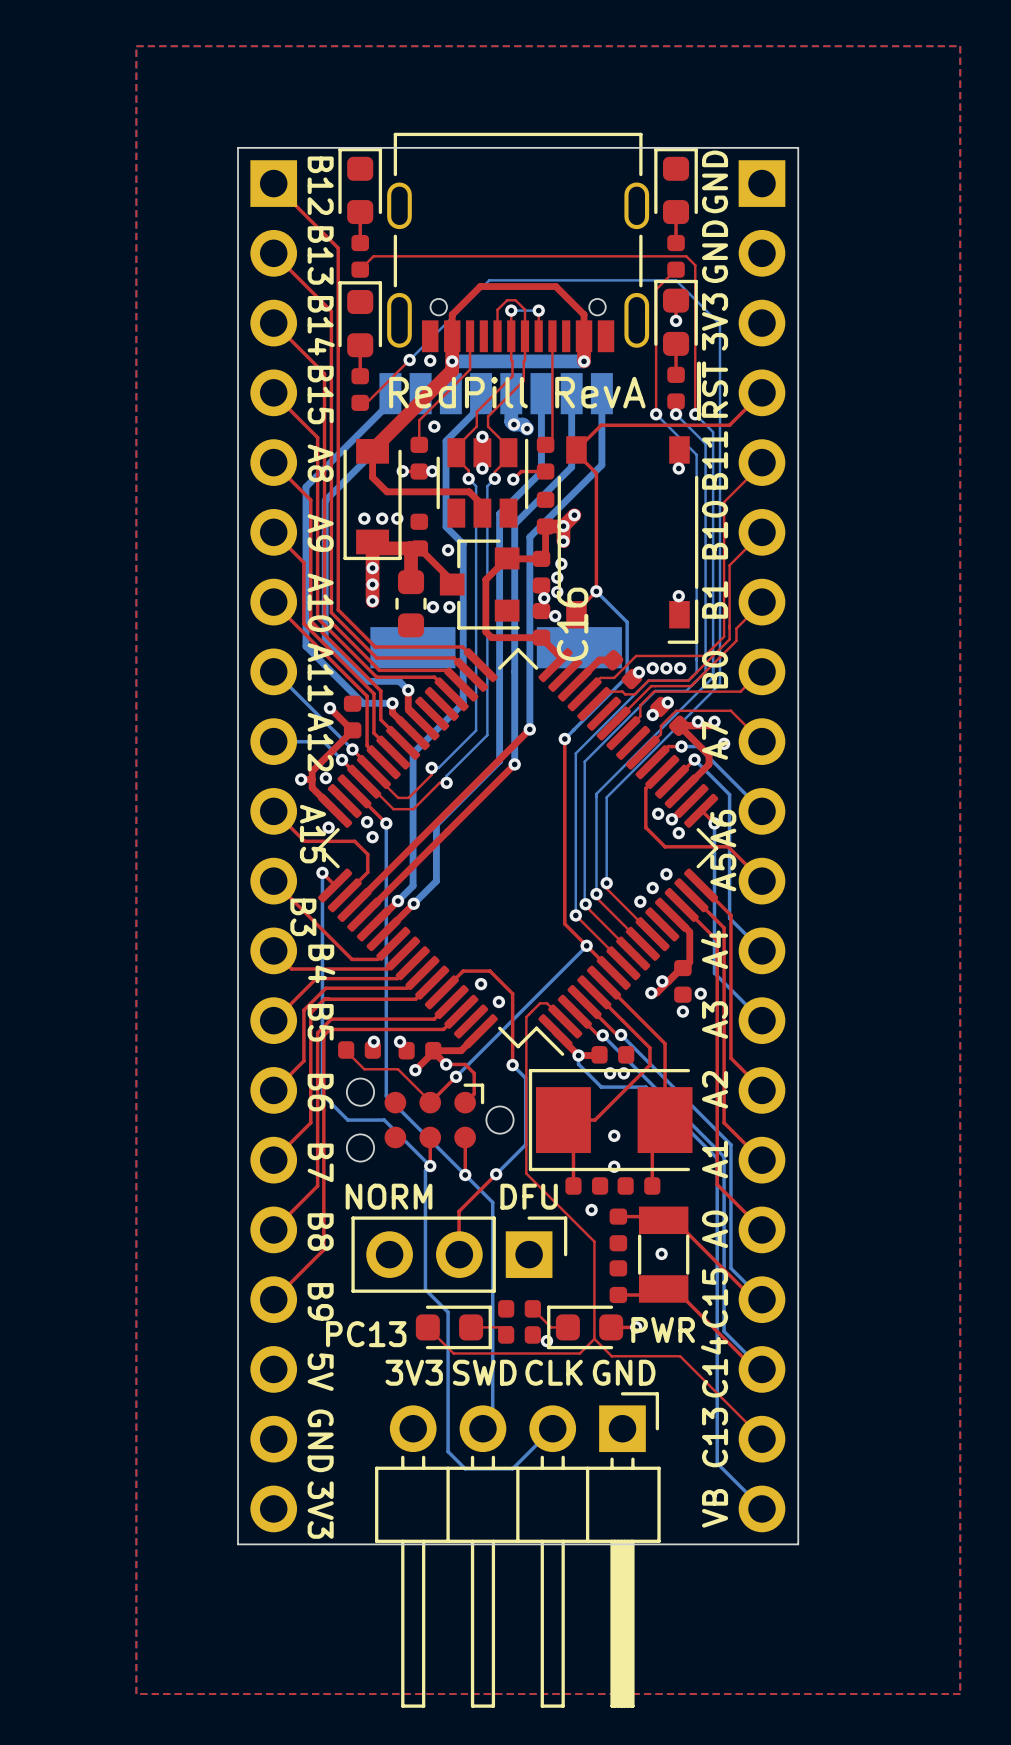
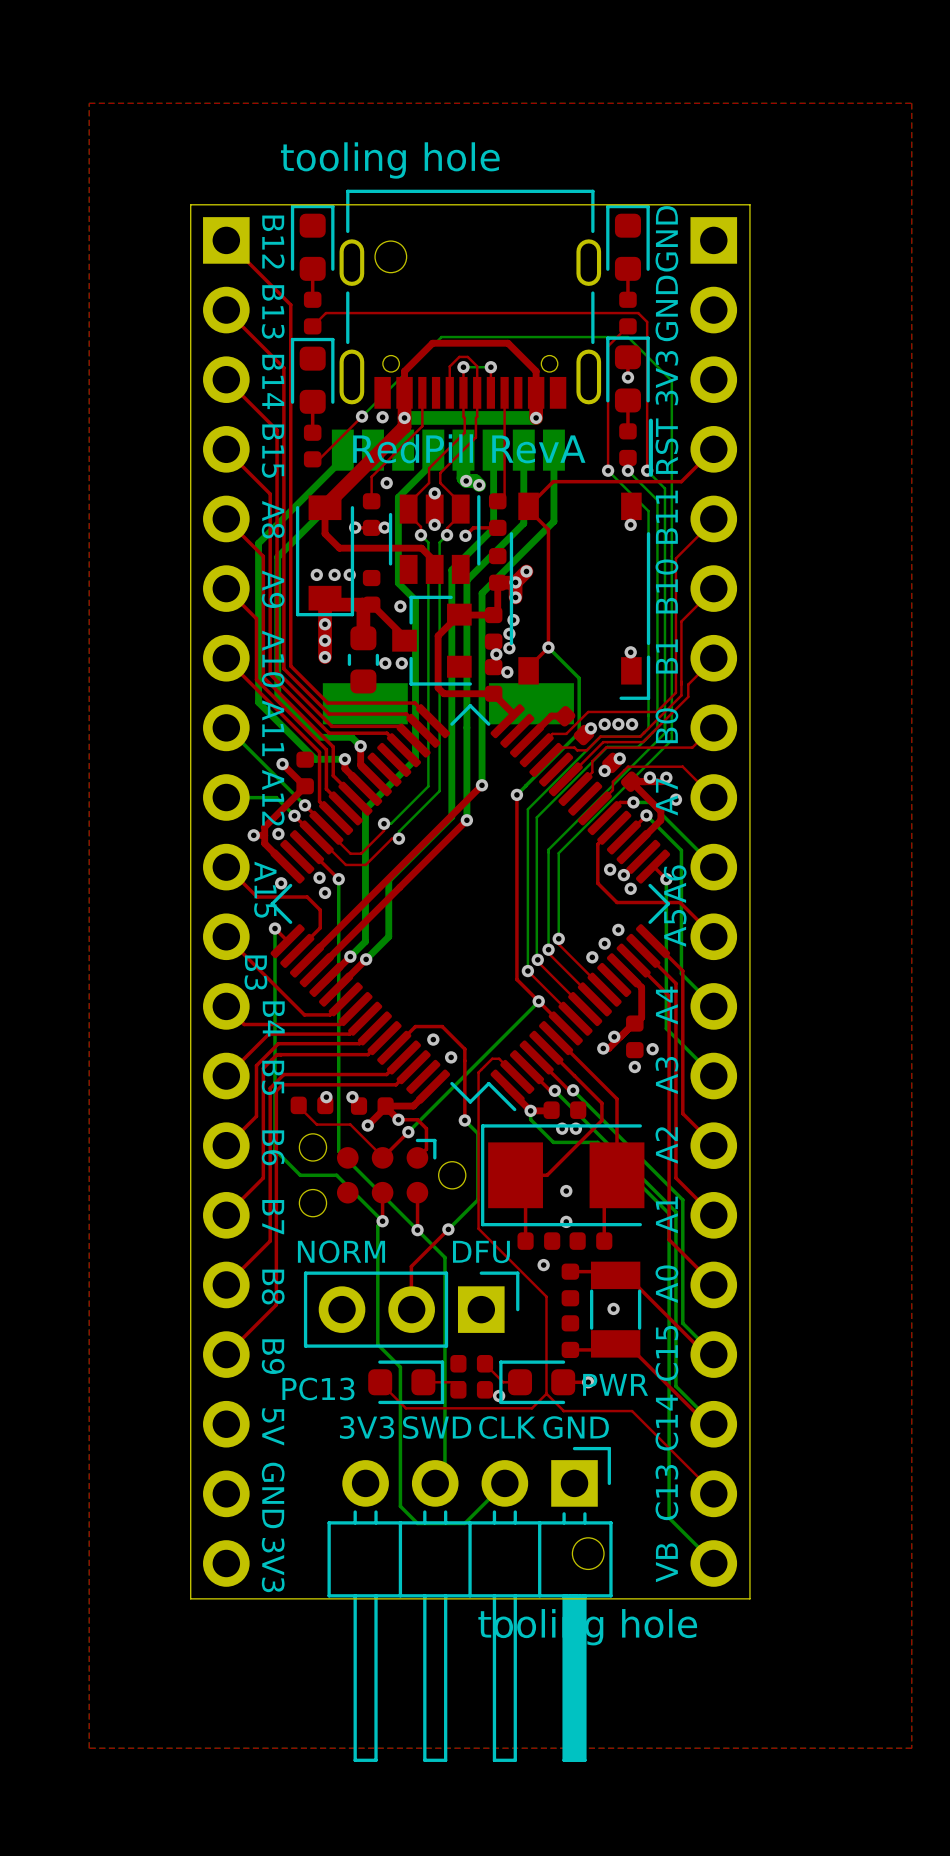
part: none -> (390, 256)
C16 name: C16 (572, 624) -> none
part: none -> (588, 1553)

